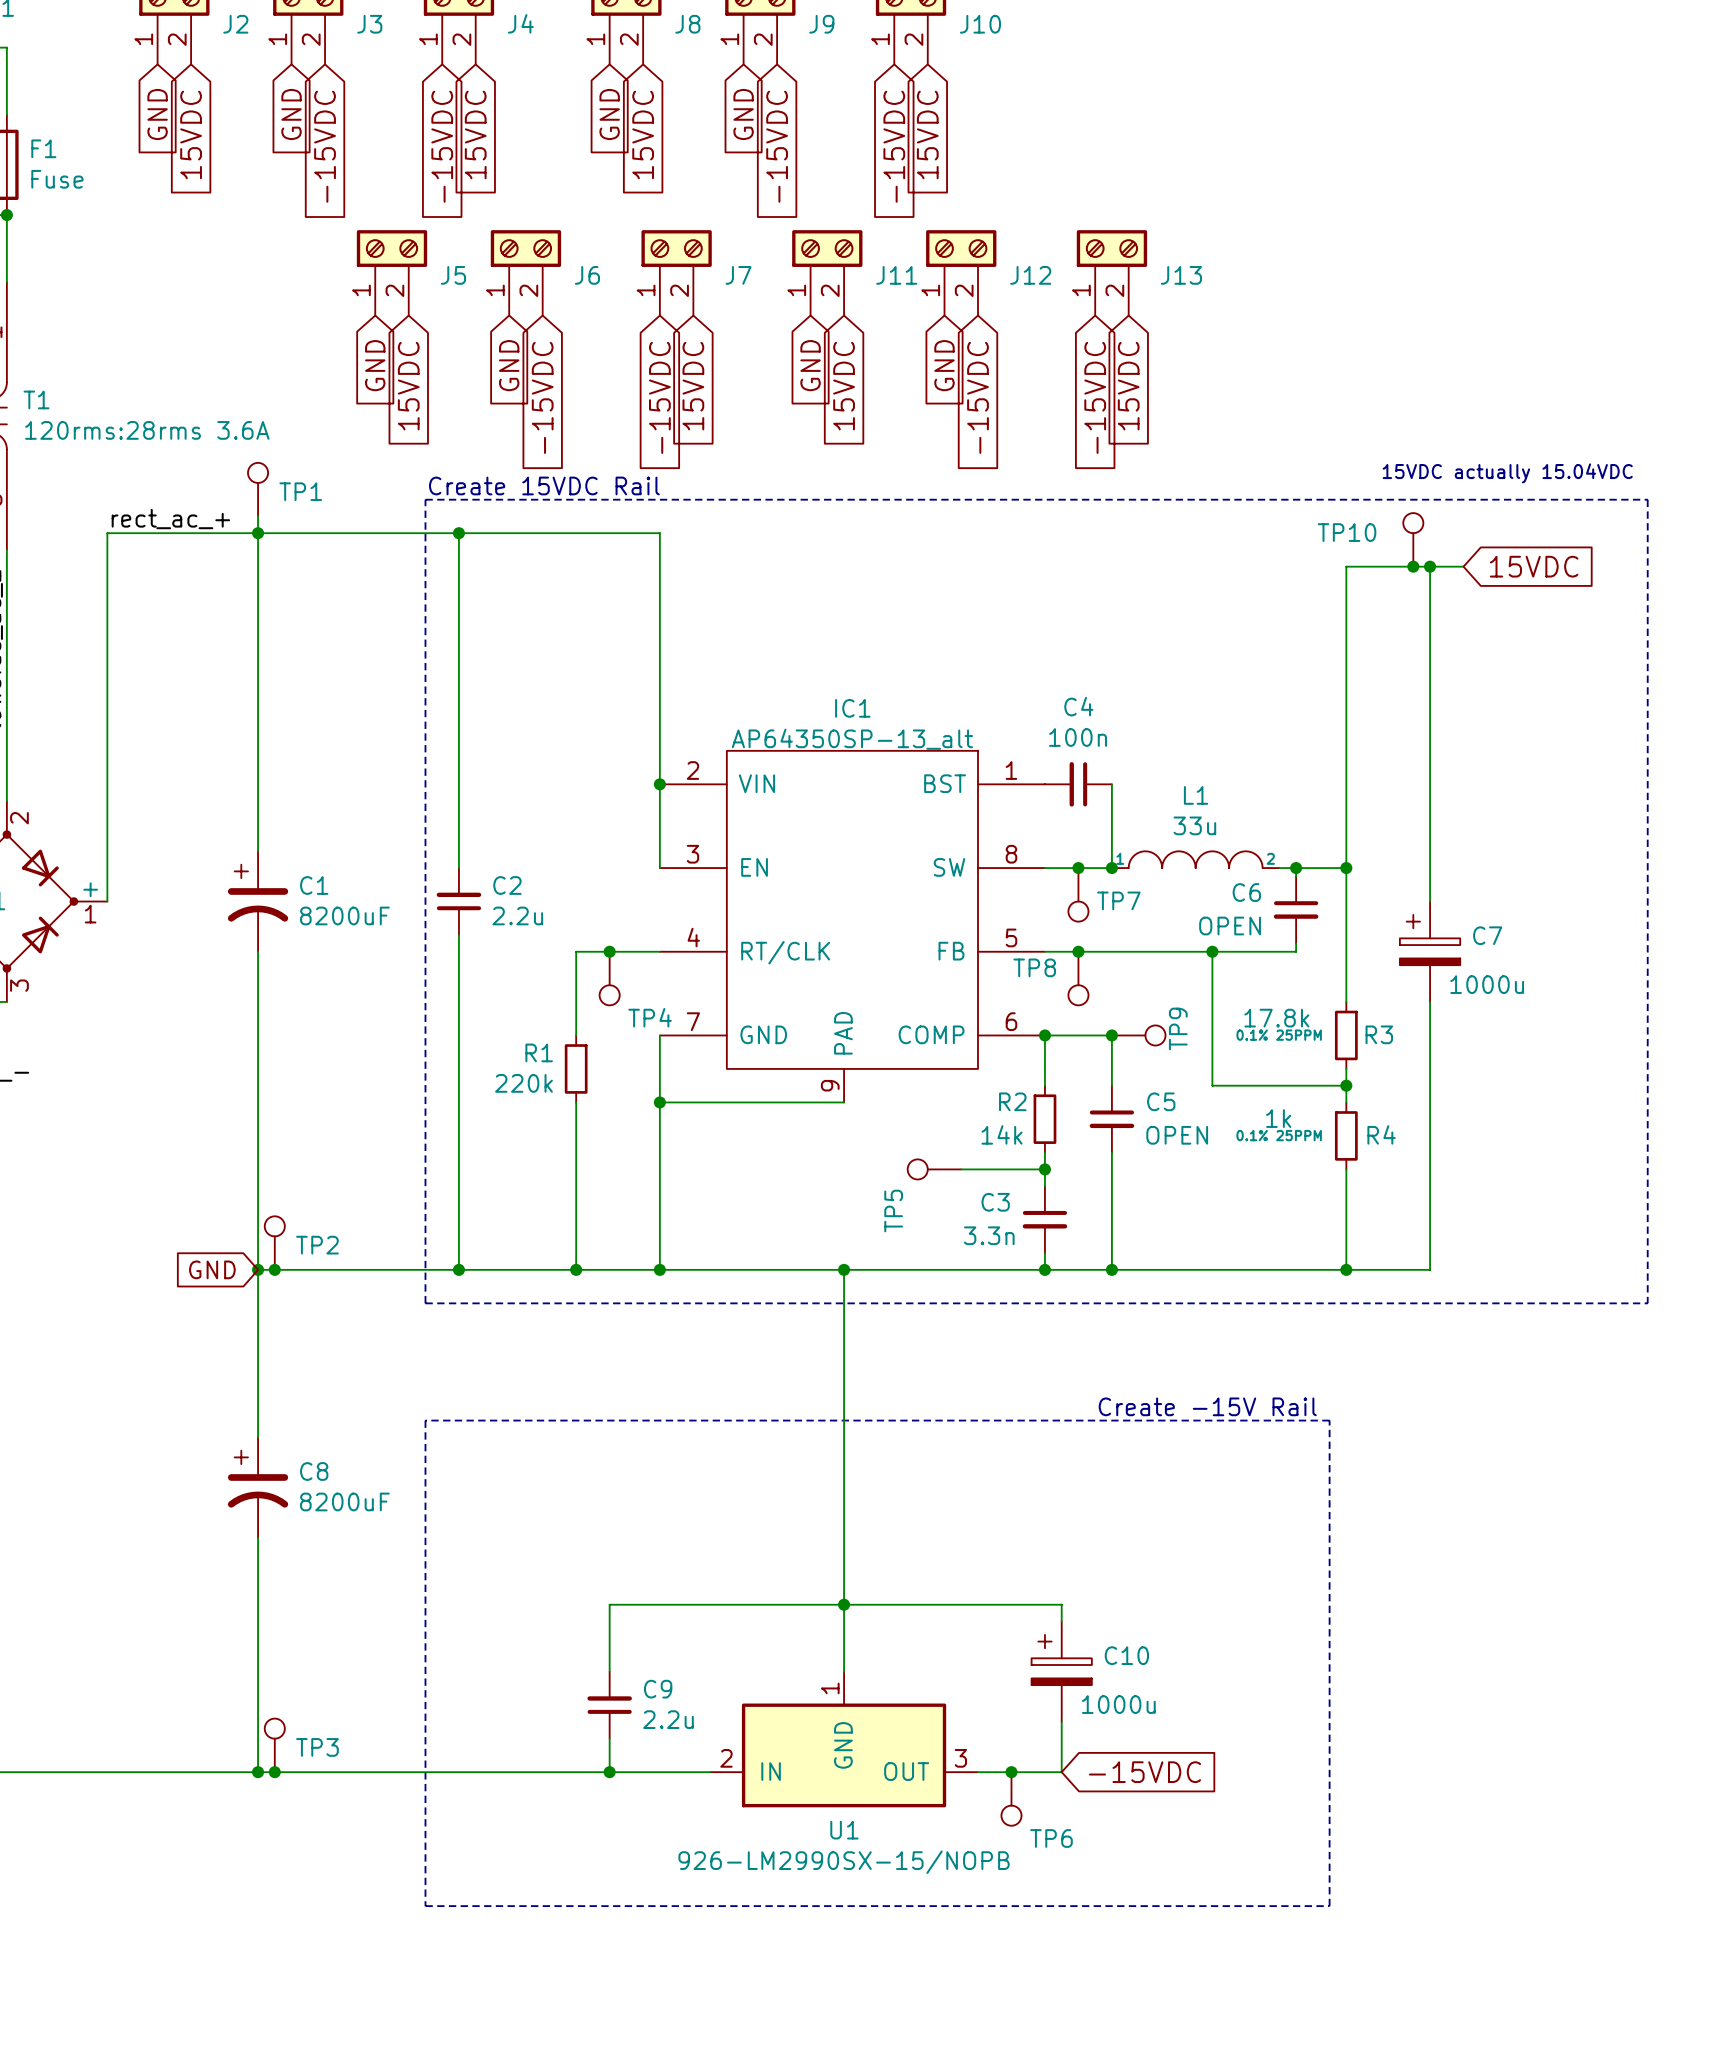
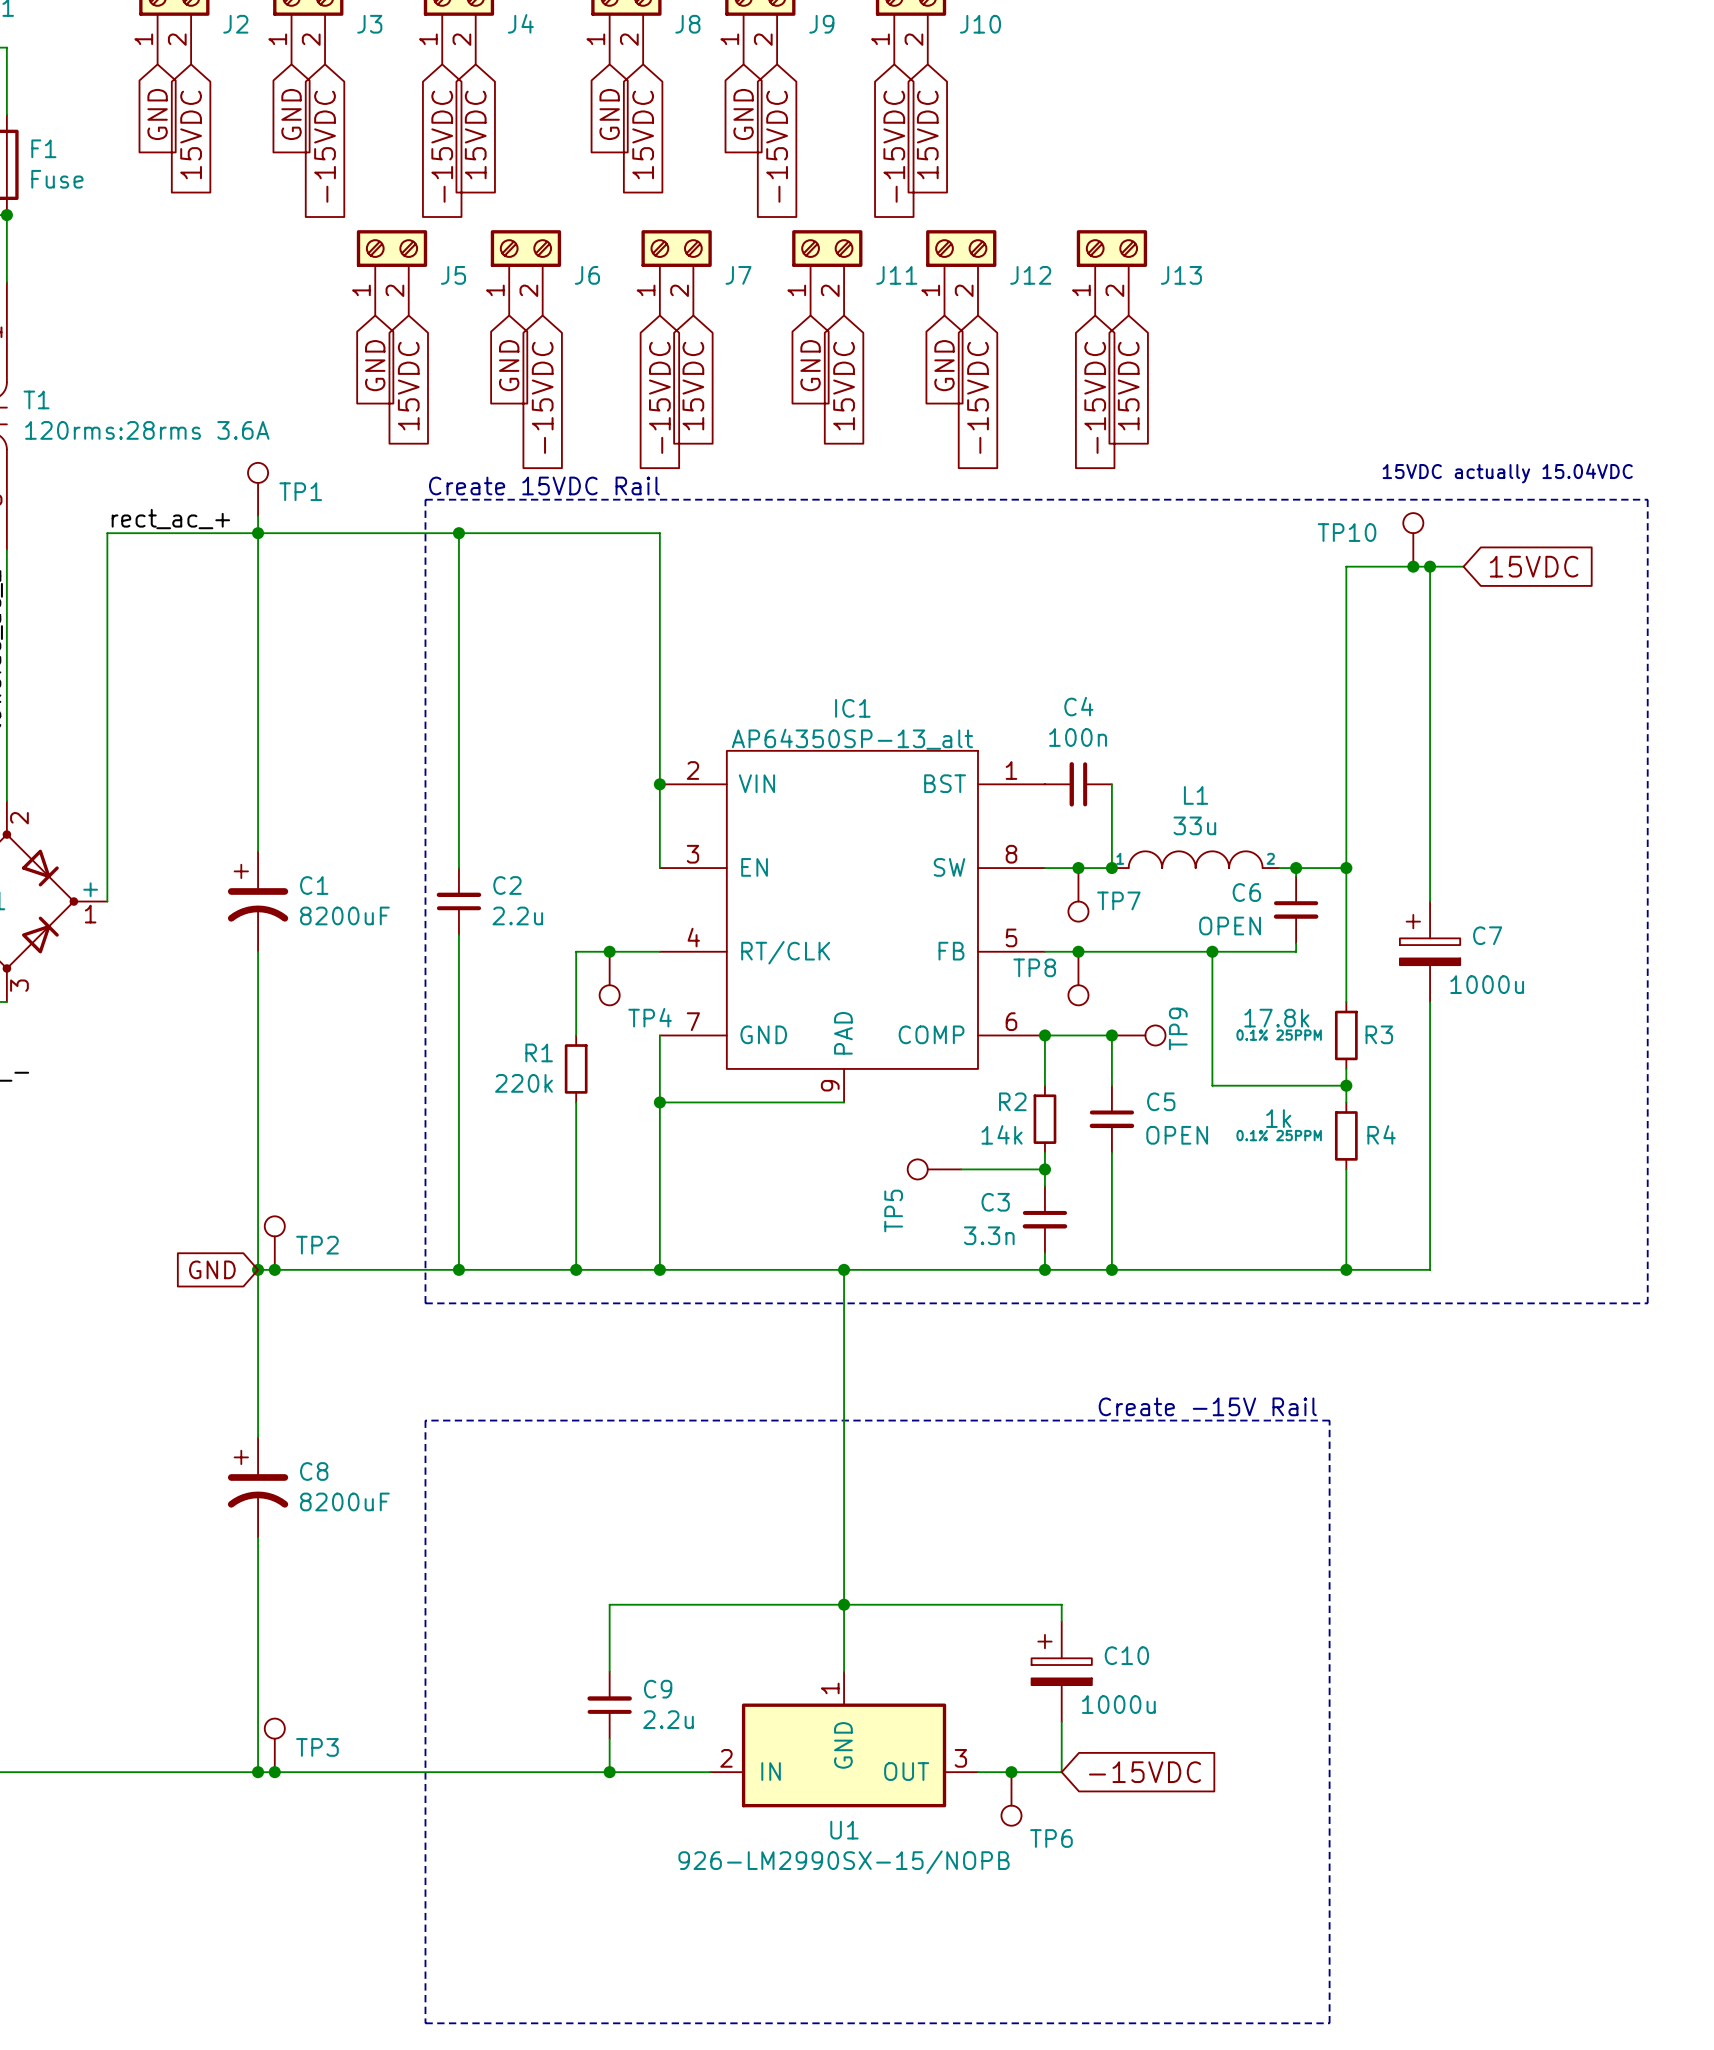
line: (425, 1906) (1329, 1906) -> (425, 1906) (425, 2023) (1329, 2023) (1329, 1906)

